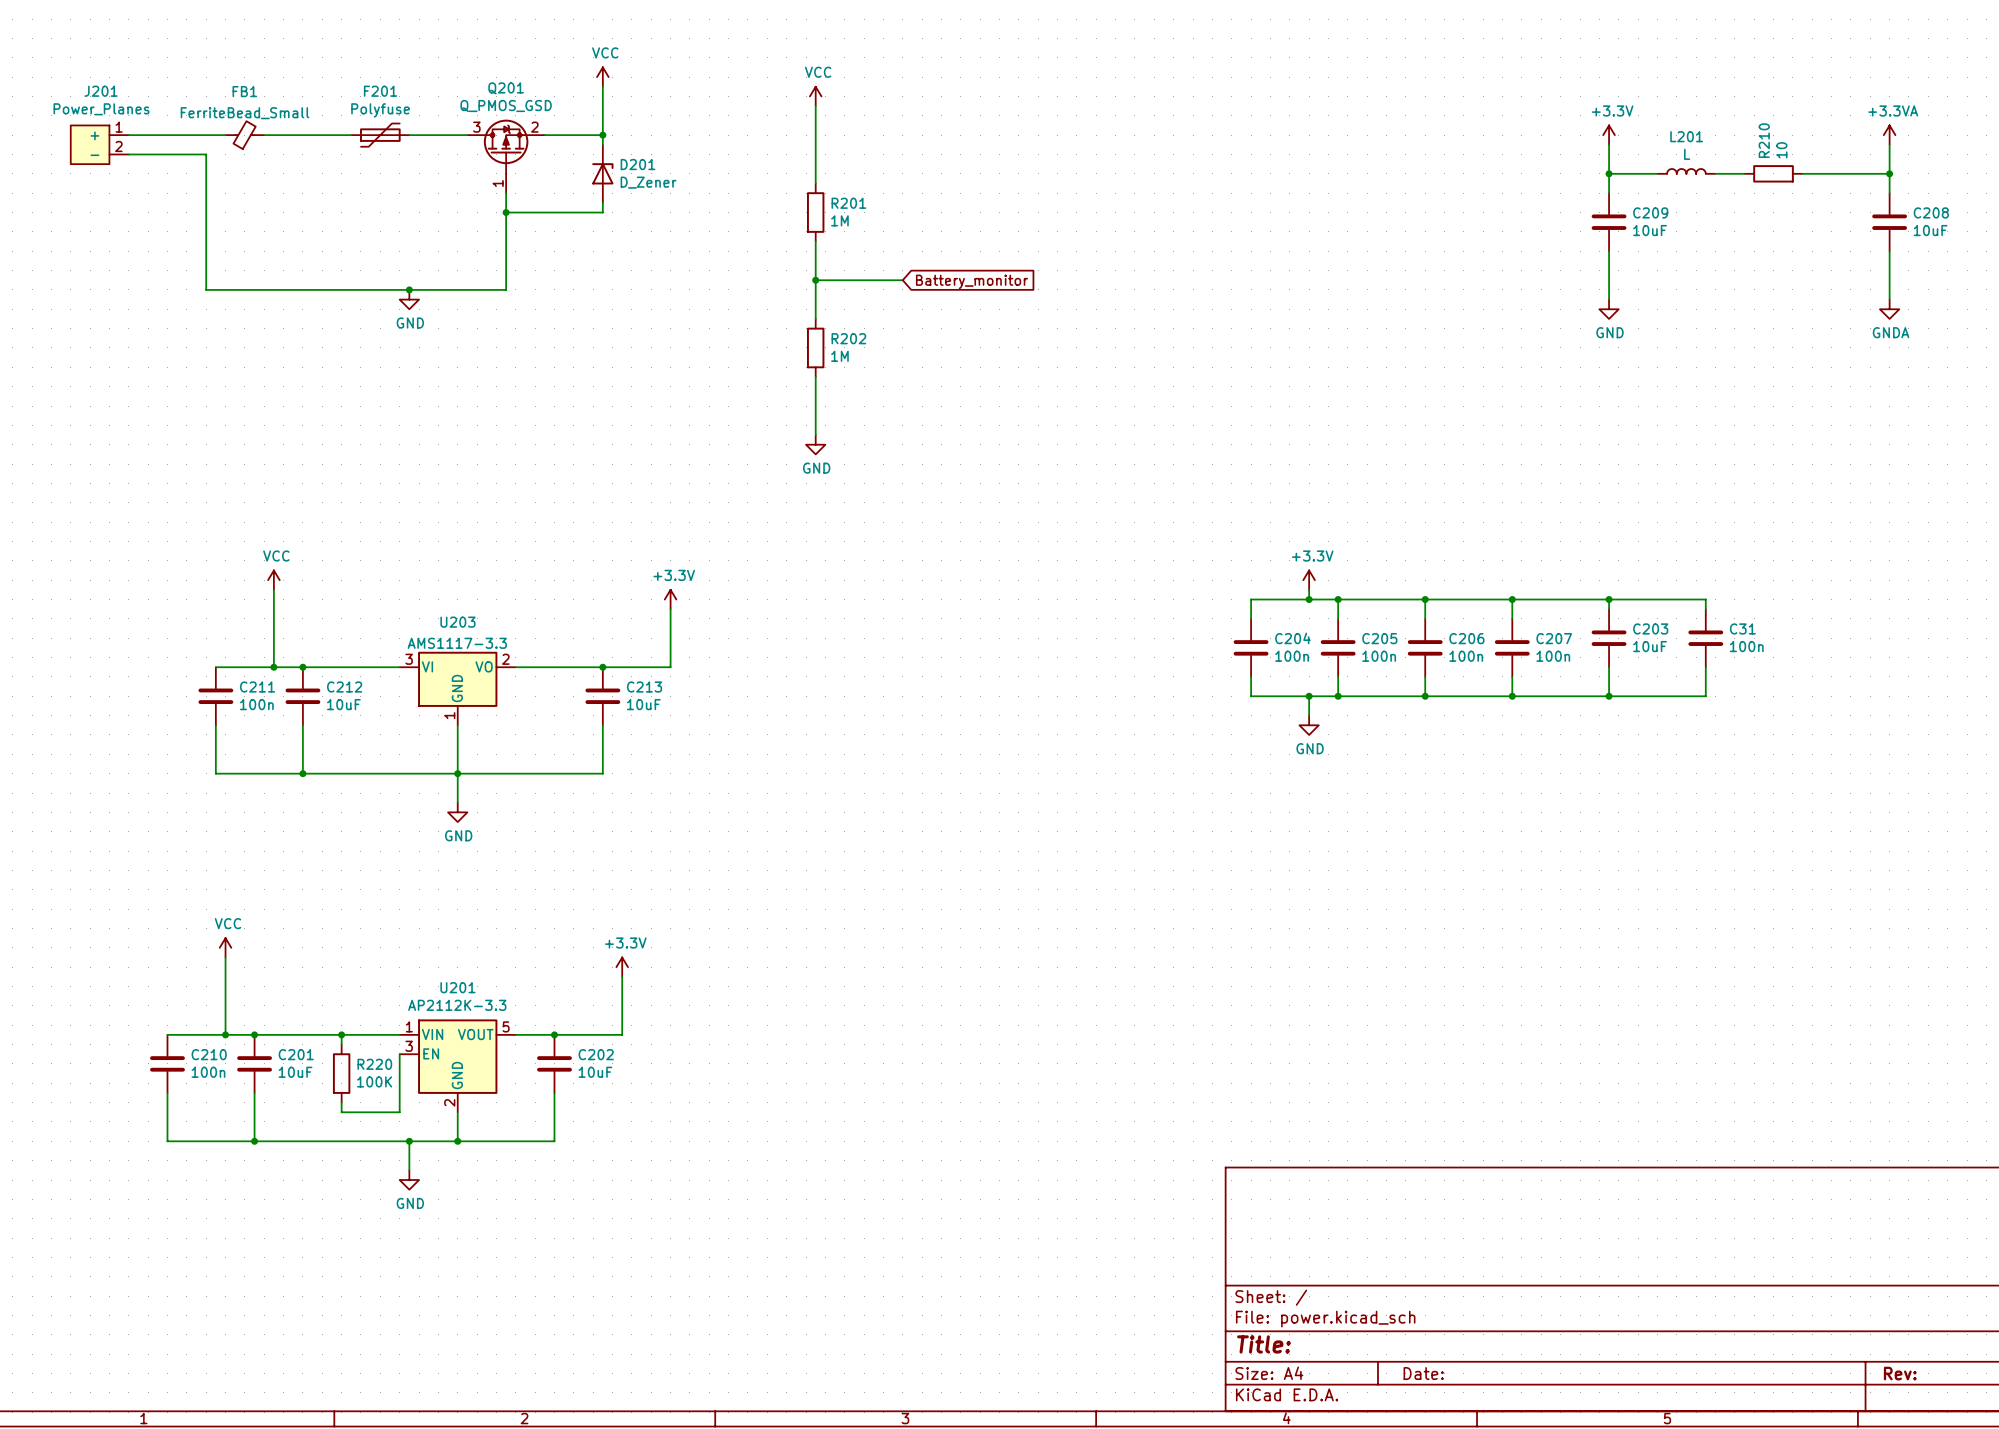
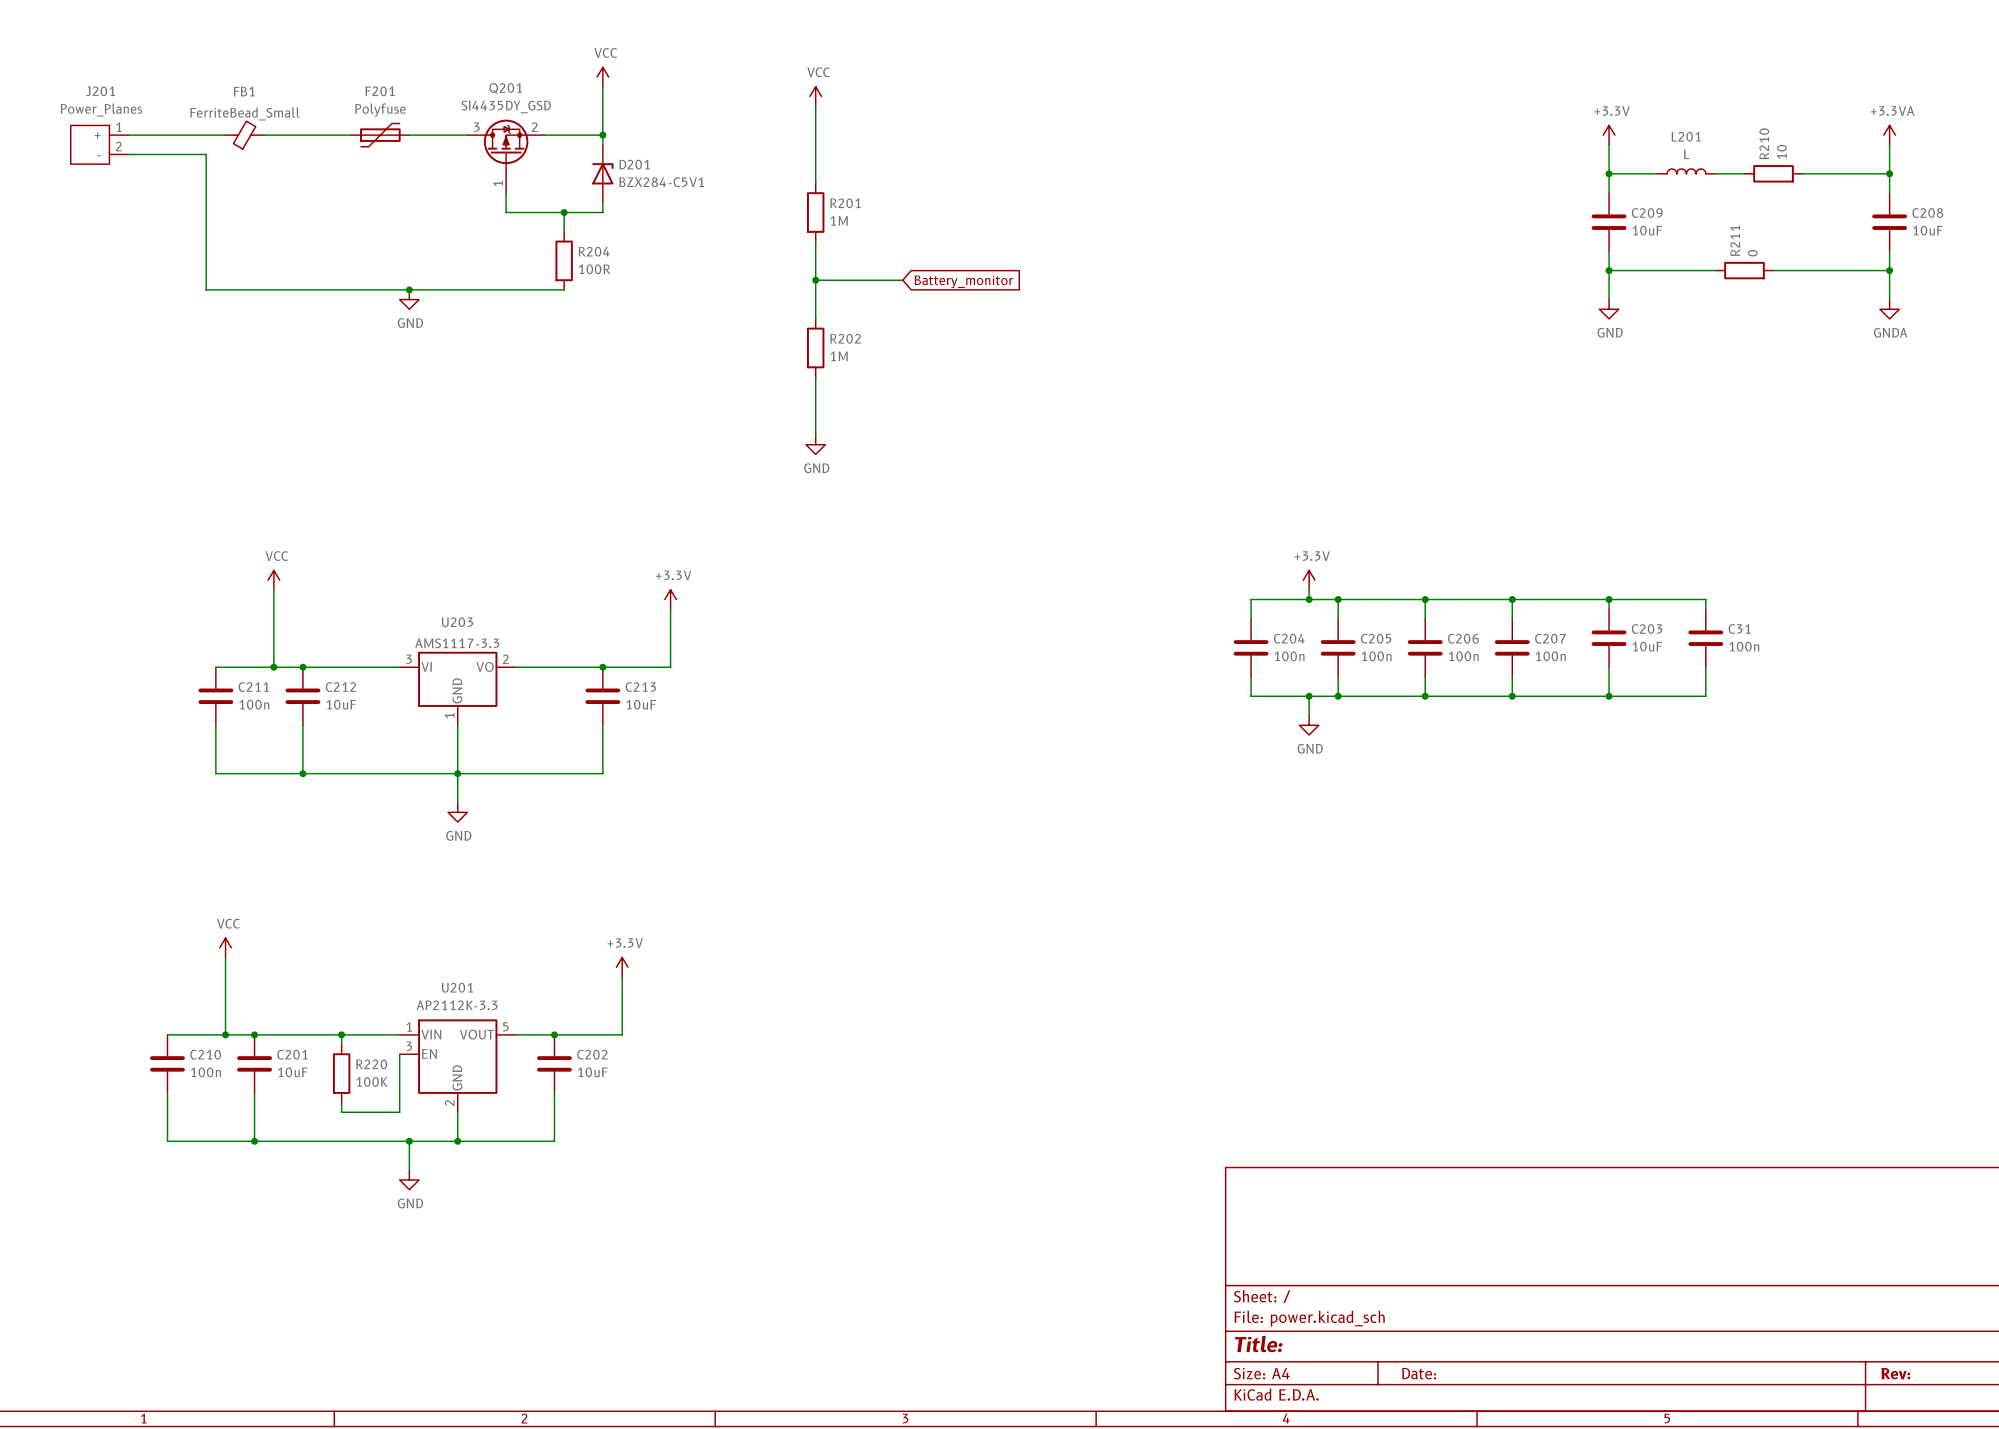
Q201 value: Q_PMOS_GSD (506, 106) -> SI4435DY_GSD (506, 106)
D201 value: D_Zener (648, 182) -> BZX284-C5V1 (661, 182)
wire: (506, 212) (506, 289) -> (564, 289) (506, 289)
junction: (506, 212) -> none
wire: none -> (564, 212) (564, 231)
junction: none -> (564, 212)
R204: none -> 100R (564, 260)
wire: none -> (1609, 270) (1715, 270)
junction: none -> (1609, 270)
R211: none -> 0 (1744, 270)
wire: none -> (1773, 270) (1889, 270)
junction: none -> (1889, 270)

